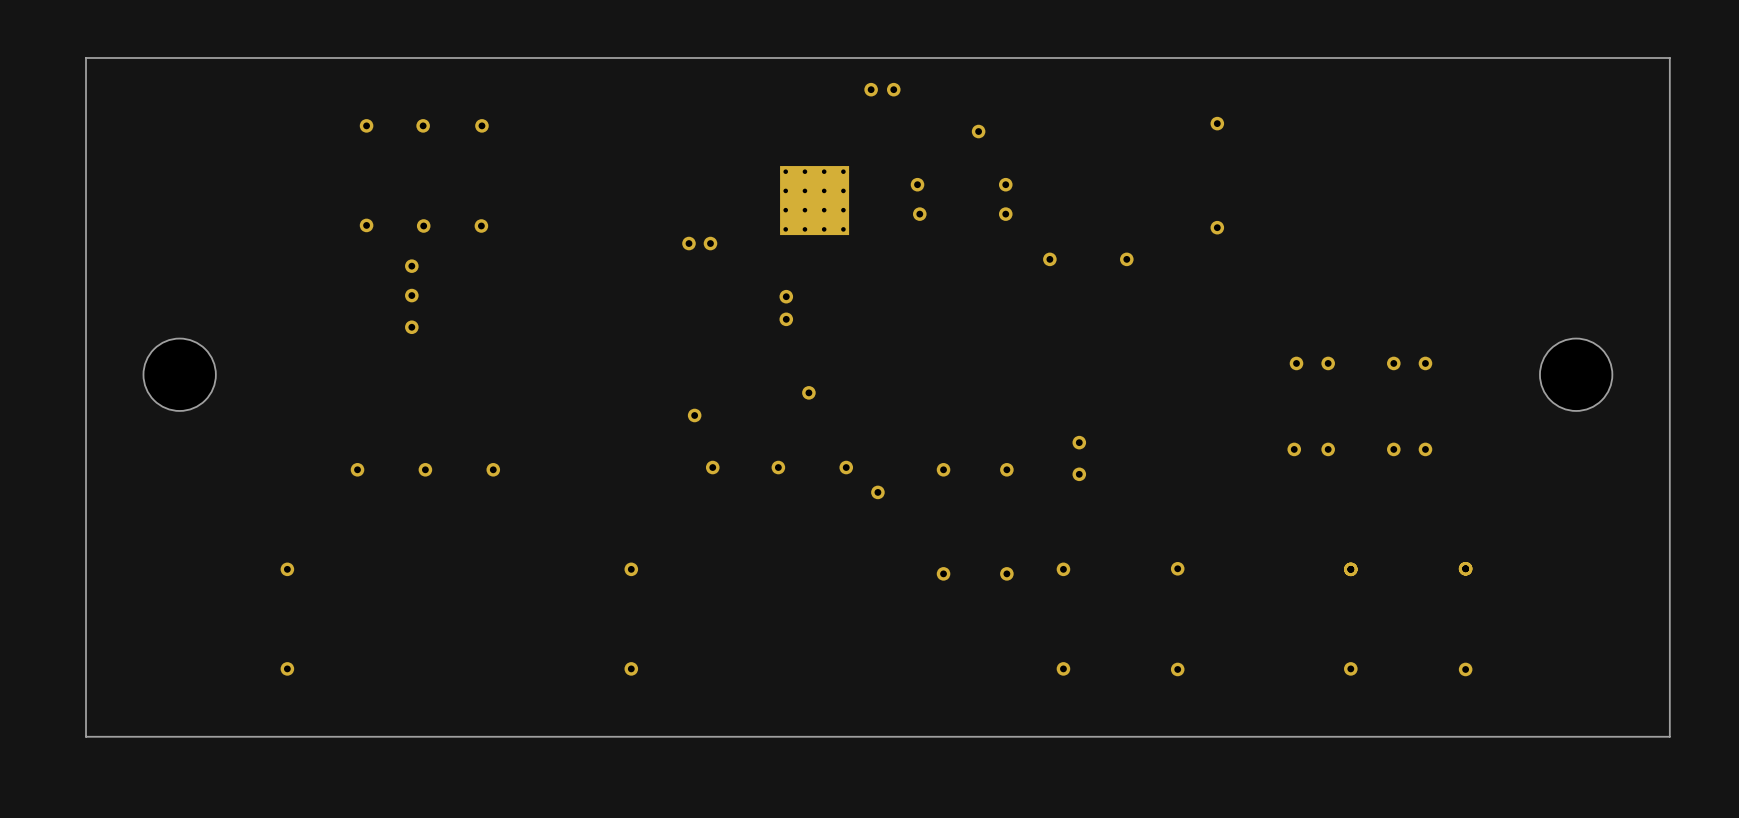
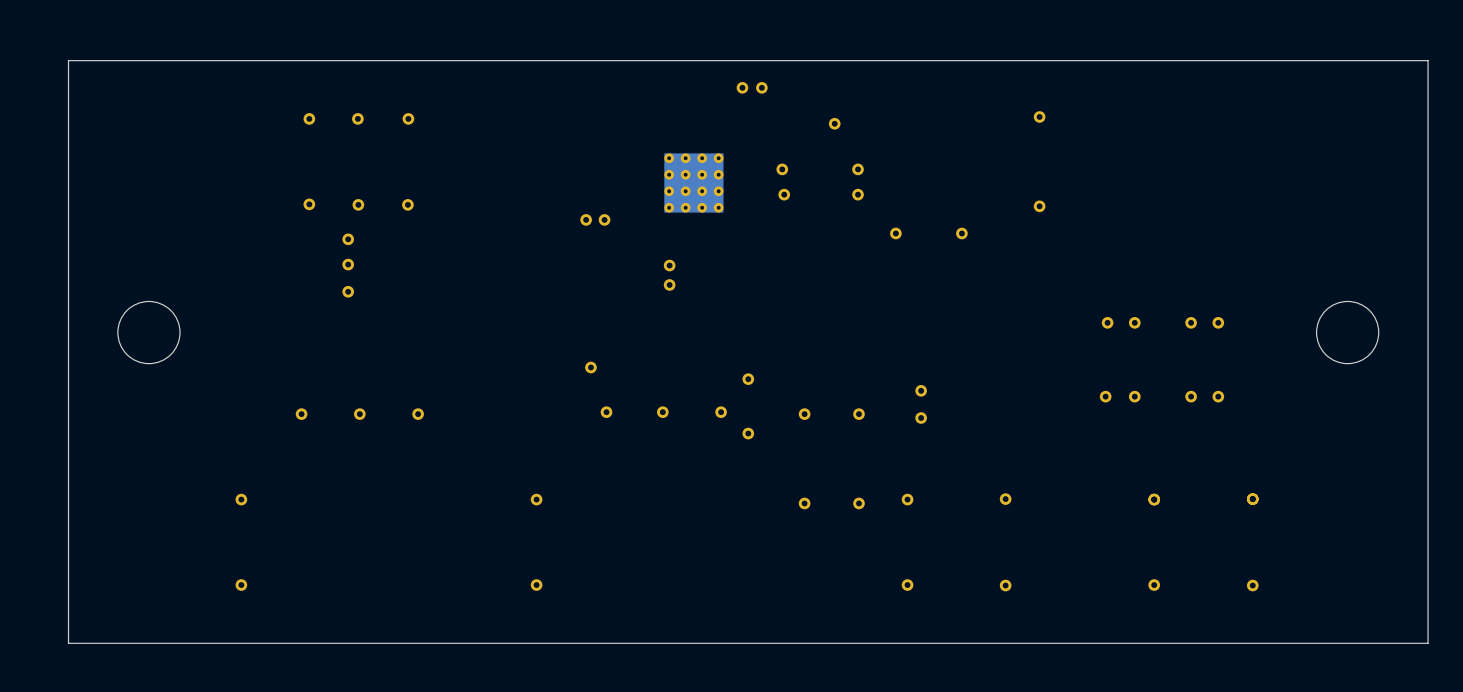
part position: (808, 392) -> (748, 379)

